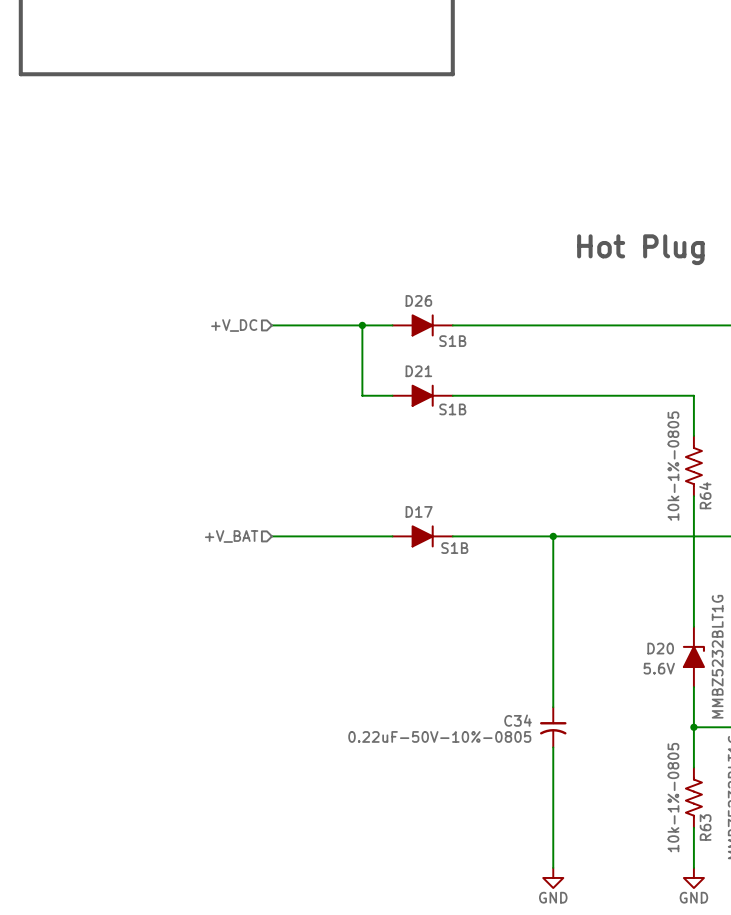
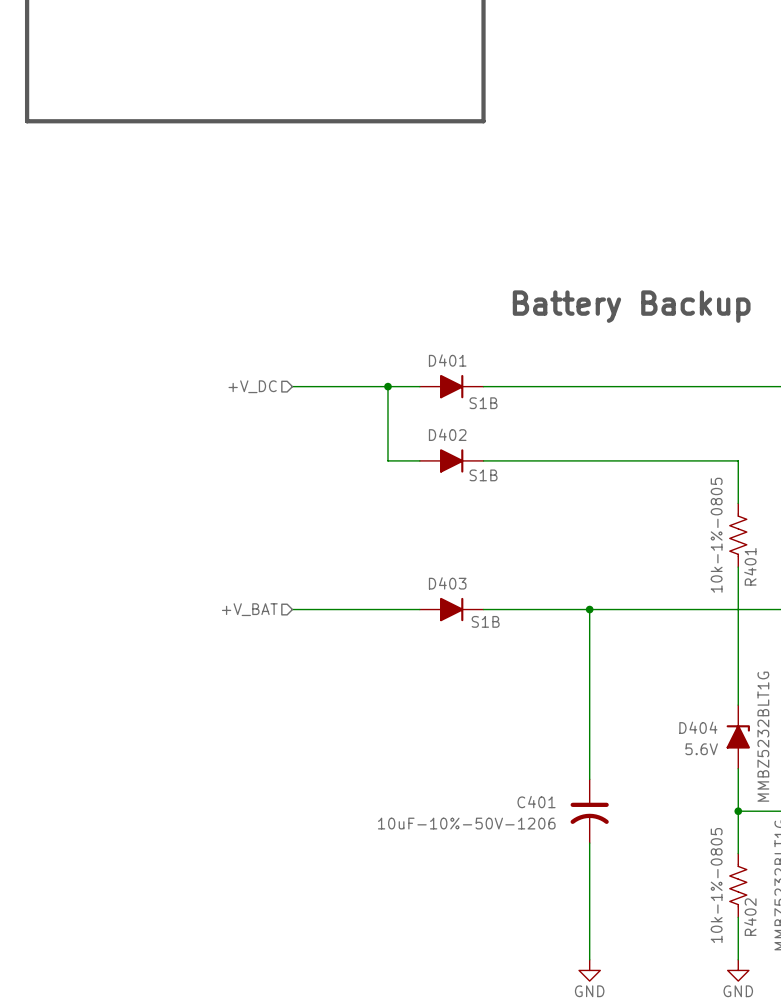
text: Hot Plug (640, 249) -> Battery Backup (631, 306)
D26 name: D26 (418, 300) -> D401 (447, 360)
D21 name: D21 (418, 371) -> D402 (447, 434)
R64 name: R64 (705, 495) -> R401 (750, 566)
D17 name: D17 (419, 511) -> D403 (447, 583)
D20 name: D20 (660, 648) -> D404 (698, 727)
C34: 0.22uF-50V-10%-0805 (553, 727) -> none
C401: none -> 10uF-10%-50V-1206 (589, 811)
R63 name: R63 (705, 827) -> R402 (750, 917)

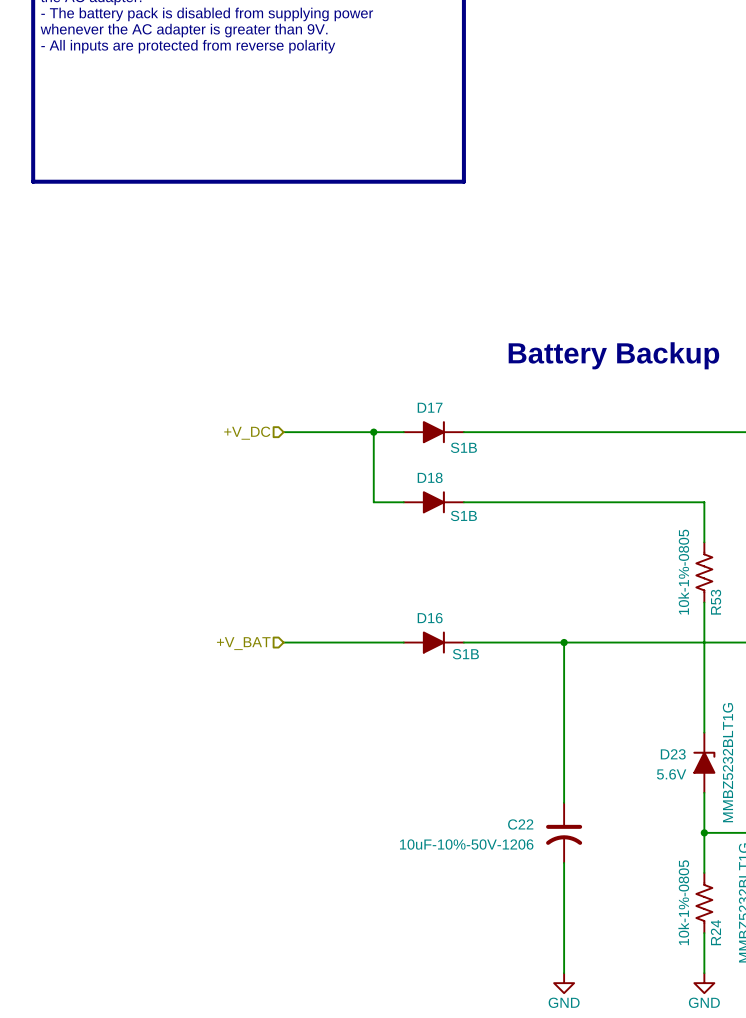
D401 name: D401 (447, 360) -> D17 (430, 407)
D402 name: D402 (447, 434) -> D18 (430, 477)
R401 name: R401 (750, 566) -> R53 (716, 602)
D403 name: D403 (447, 583) -> D16 (430, 618)
D404 name: D404 (698, 727) -> D23 (673, 754)
C401 name: C401 (536, 802) -> C22 (520, 824)
R402 name: R402 (750, 917) -> R24 (715, 932)

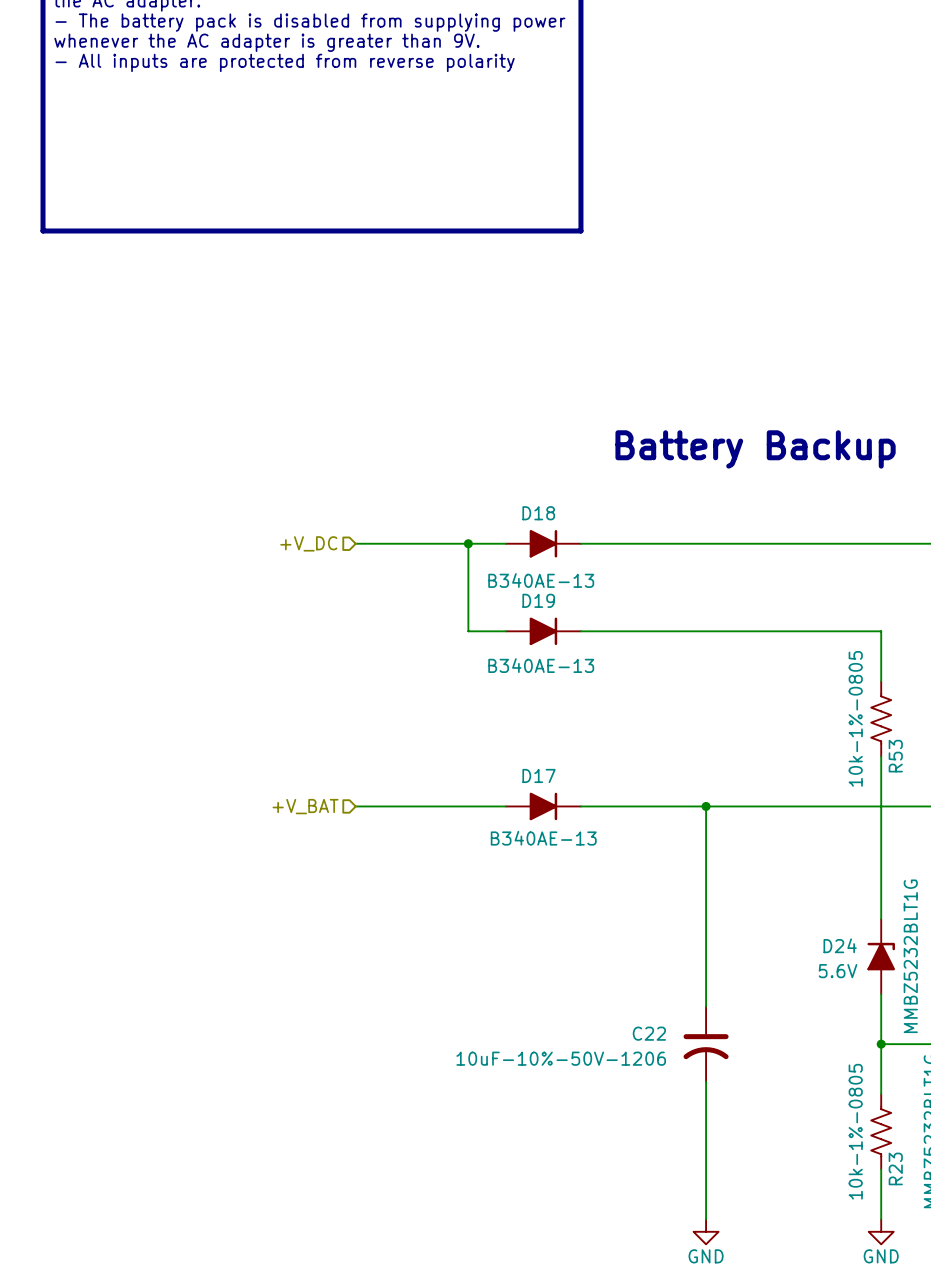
D17 name: D17 (430, 407) -> D18 (538, 513)
D17 value: S1B (463, 447) -> B340AE-13 (541, 580)
D18 name: D18 (430, 477) -> D19 (538, 600)
D18 value: S1B (463, 515) -> B340AE-13 (541, 665)
D16 name: D16 (430, 618) -> D17 (539, 775)
D16 value: S1B (465, 654) -> B340AE-13 (543, 838)
D23 name: D23 (673, 754) -> D24 (840, 945)
R24 name: R24 (715, 932) -> R23 (895, 1168)

